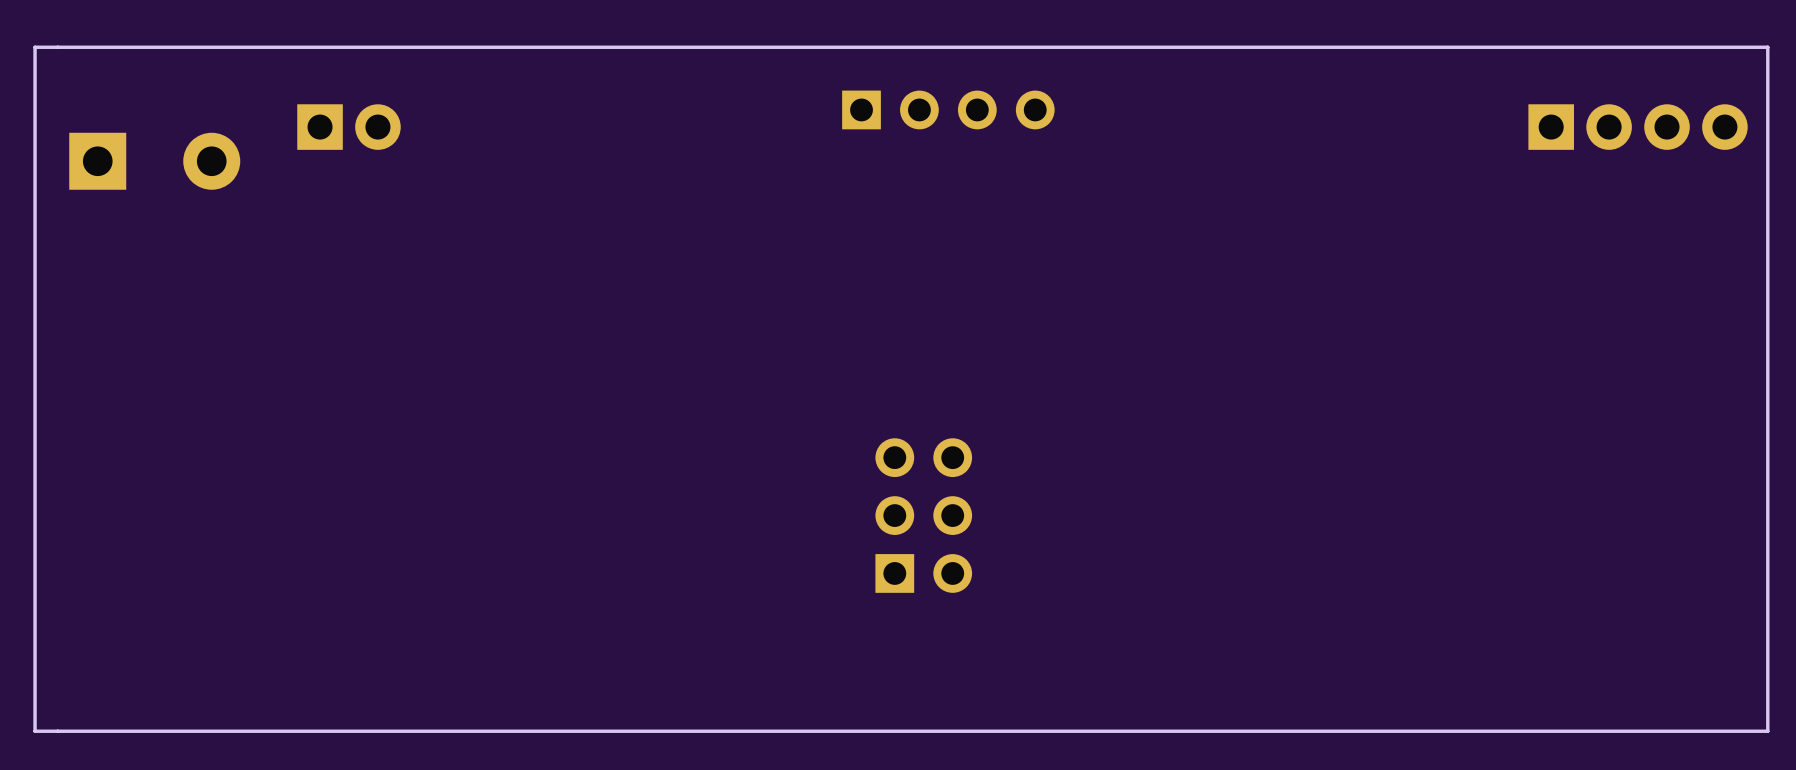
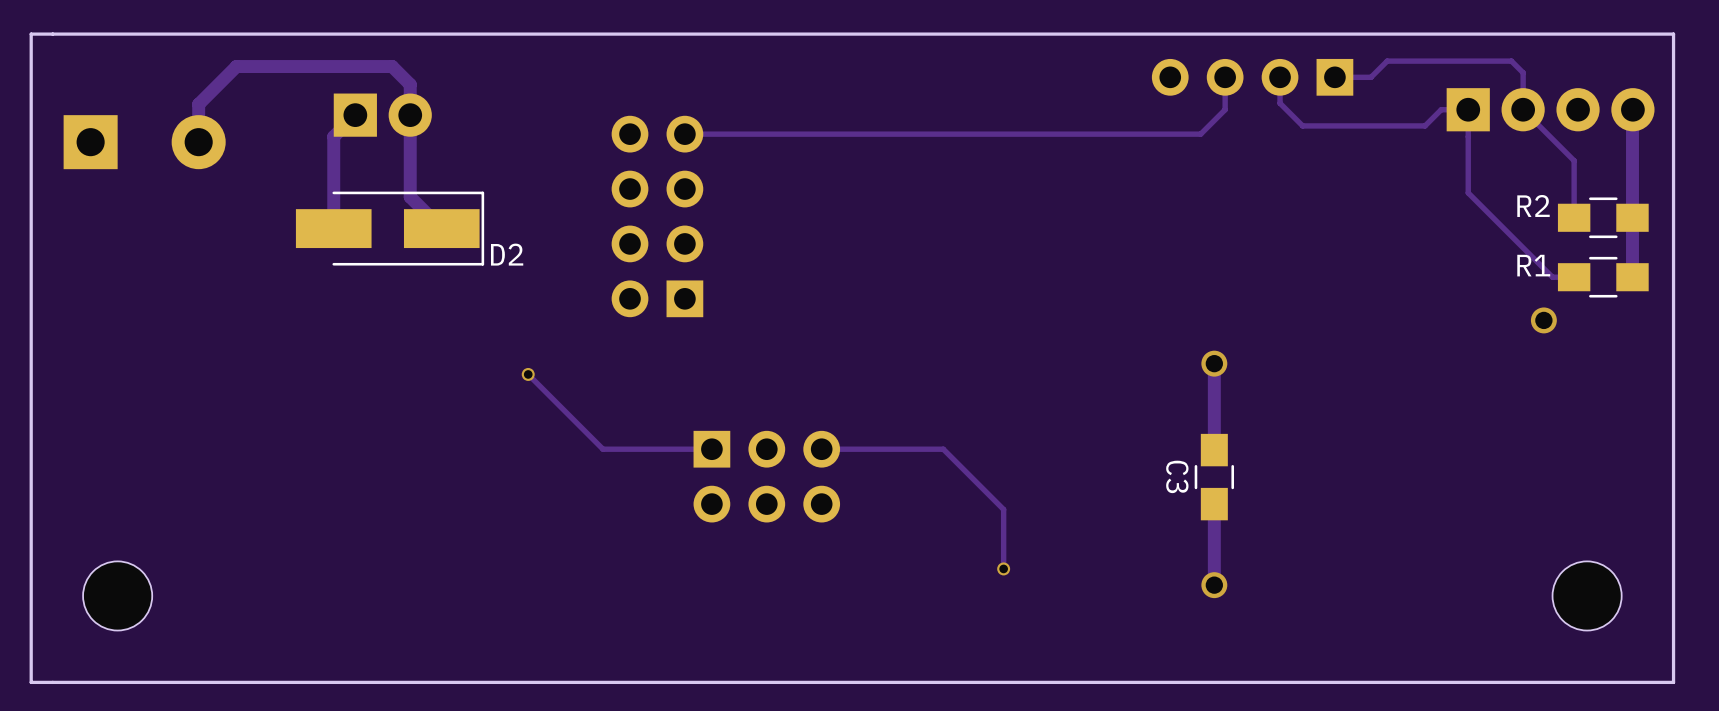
track: none -> (1225, 77) (1225, 109) (1200, 134) (684, 134)
track: none -> (1280, 77) (1280, 103) (1302, 125) (1425, 125) (1441, 109) (1468, 109) (1468, 192) (1552, 277) (1574, 277)
track: none -> (1334, 77) (1371, 77) (1387, 61) (1511, 61) (1523, 72) (1523, 109) (1574, 160) (1574, 217)
part rotation: 0° (948, 109) -> 180° (1252, 77)
part position: (948, 109) -> (1252, 77)
part position: (348, 127) -> (382, 115)
track: none -> (1632, 109) (1632, 277)
track: none -> (355, 115) (333, 136) (333, 228)
track: none -> (198, 142) (198, 104) (236, 66) (392, 66) (410, 84) (410, 197) (441, 228)
part: none -> (657, 216)
R2: none -> (1603, 217)
D2: none -> (390, 228)
R1: none -> (1603, 277)
via: none -> (1543, 320)
track: none -> (1214, 363) (1214, 450)
via: none -> (1214, 363)
track: none -> (528, 374) (603, 449) (711, 449)
via: none -> (528, 374)
track: none -> (821, 449) (943, 449) (1003, 509) (1003, 568)
C3: none -> (1214, 477)
part rotation: 0° (923, 515) -> 90° clockwise (766, 476)
part position: (923, 515) -> (766, 476)
track: none -> (1214, 504) (1214, 585)
via: none -> (1003, 568)
via: none -> (1214, 585)
part: none -> (117, 595)
part: none -> (1587, 595)

